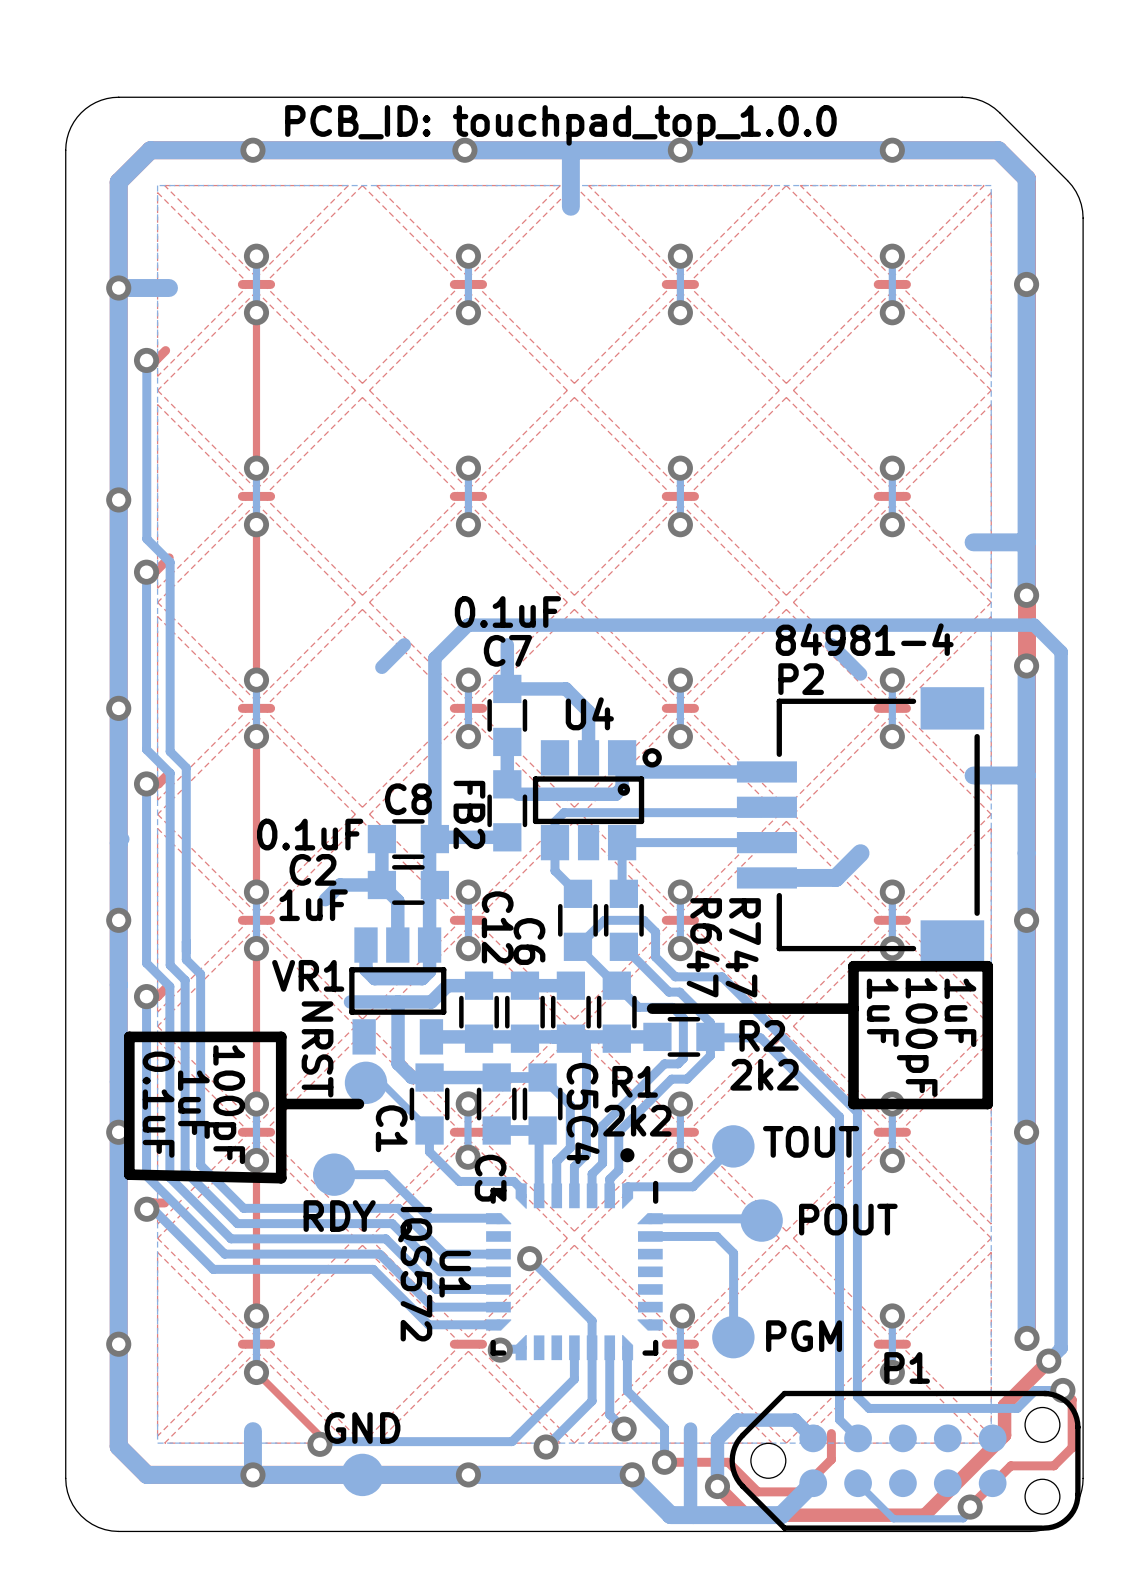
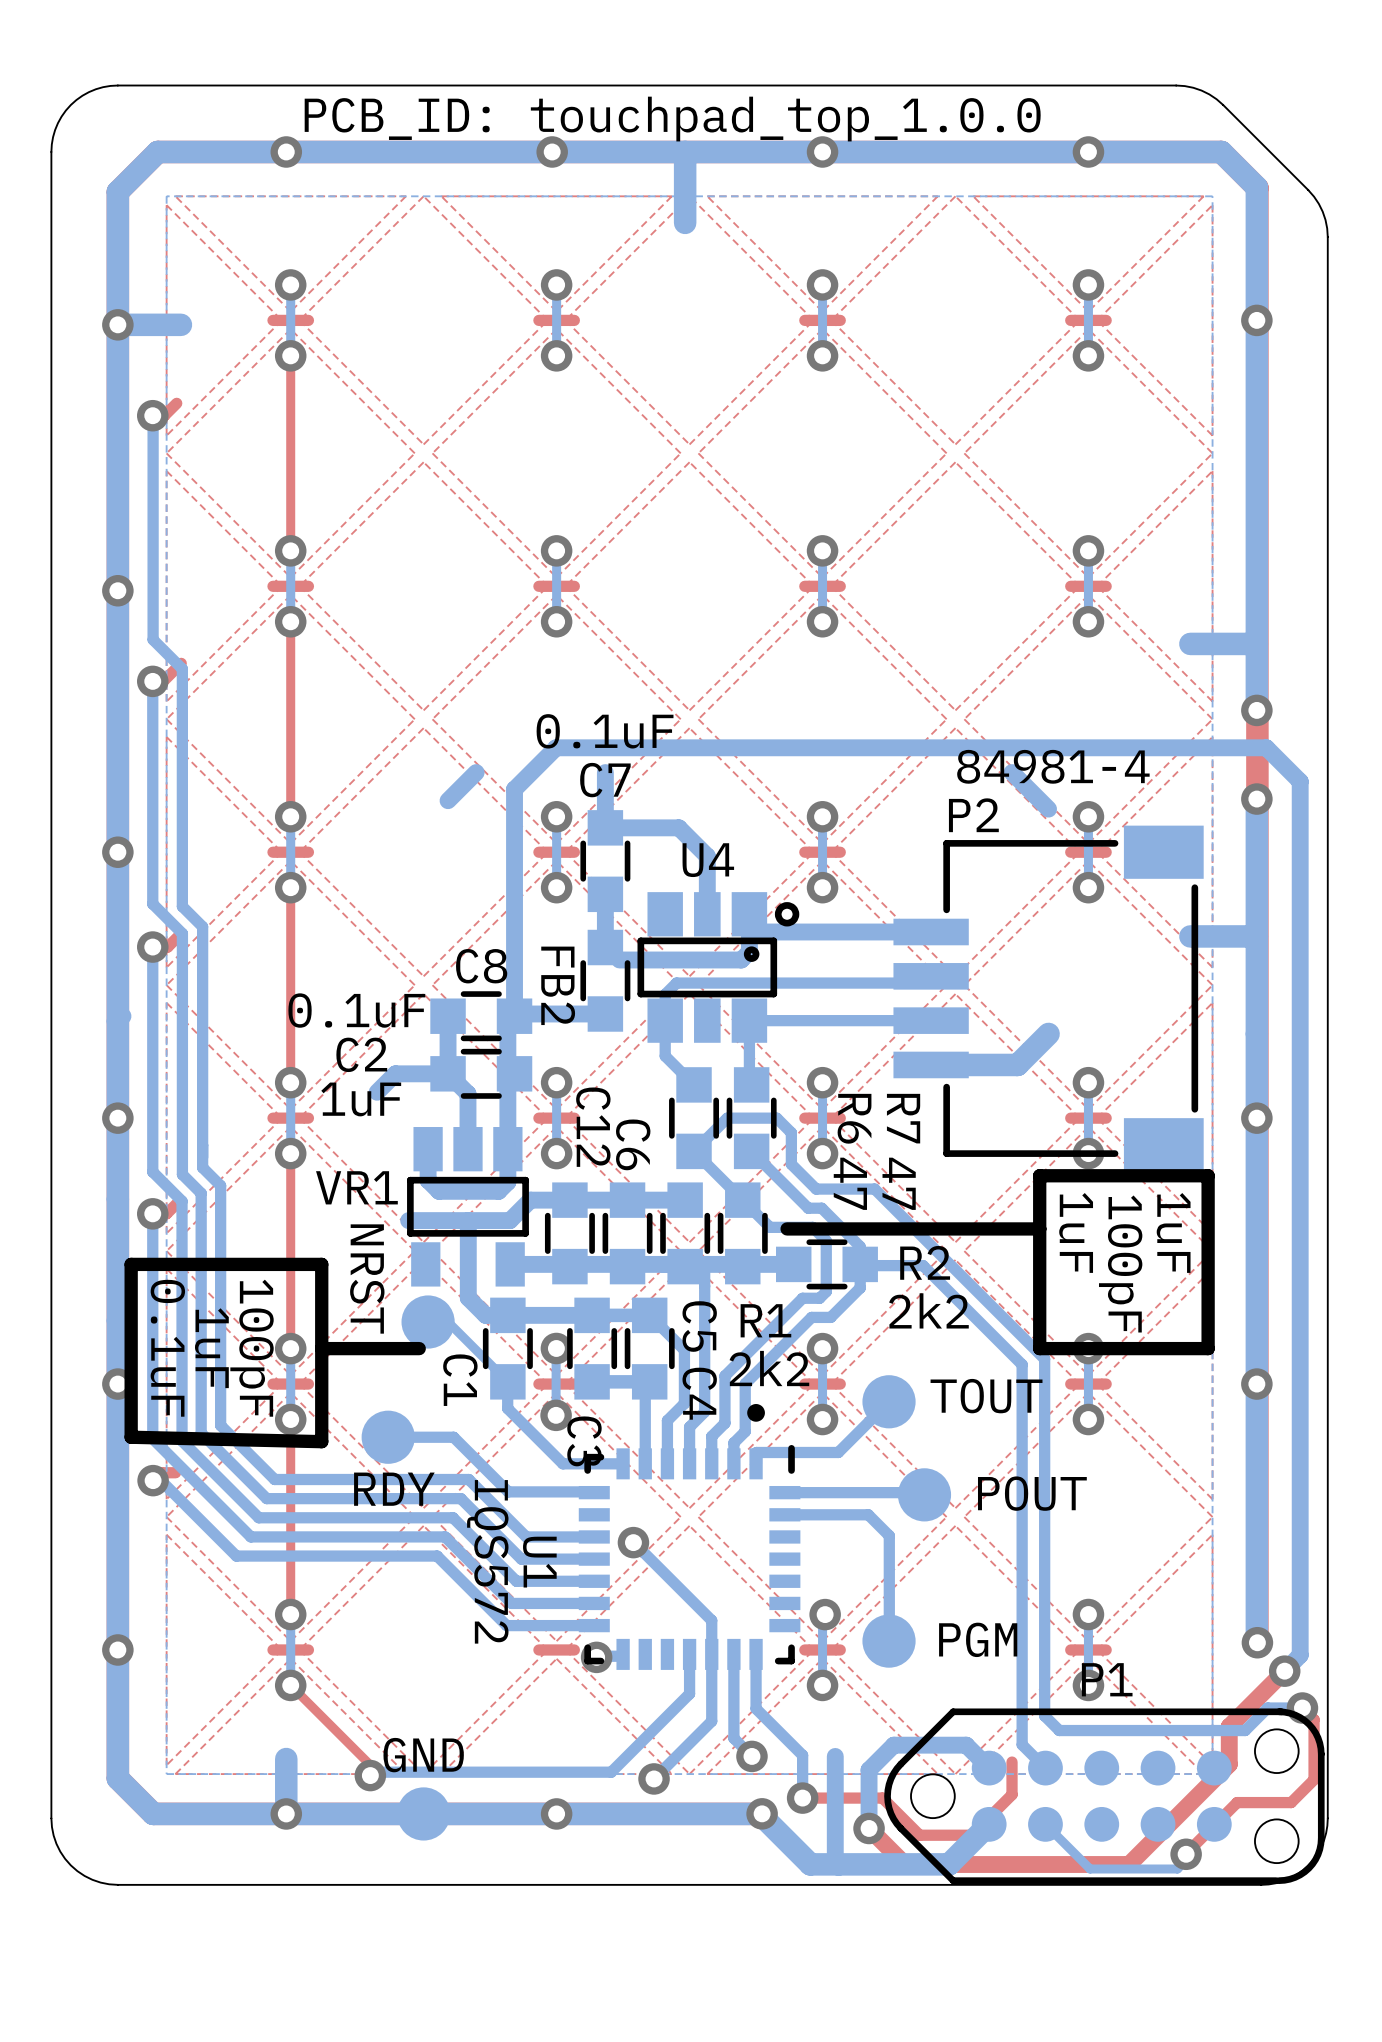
U1 footprint: [485, 1148, 663, 1361] -> [578, 1404, 801, 1670]
bottom track: (459, 1181) (513, 1181) (521, 1189) (521, 1195) -> (544, 1445) (562, 1463) (623, 1463)

